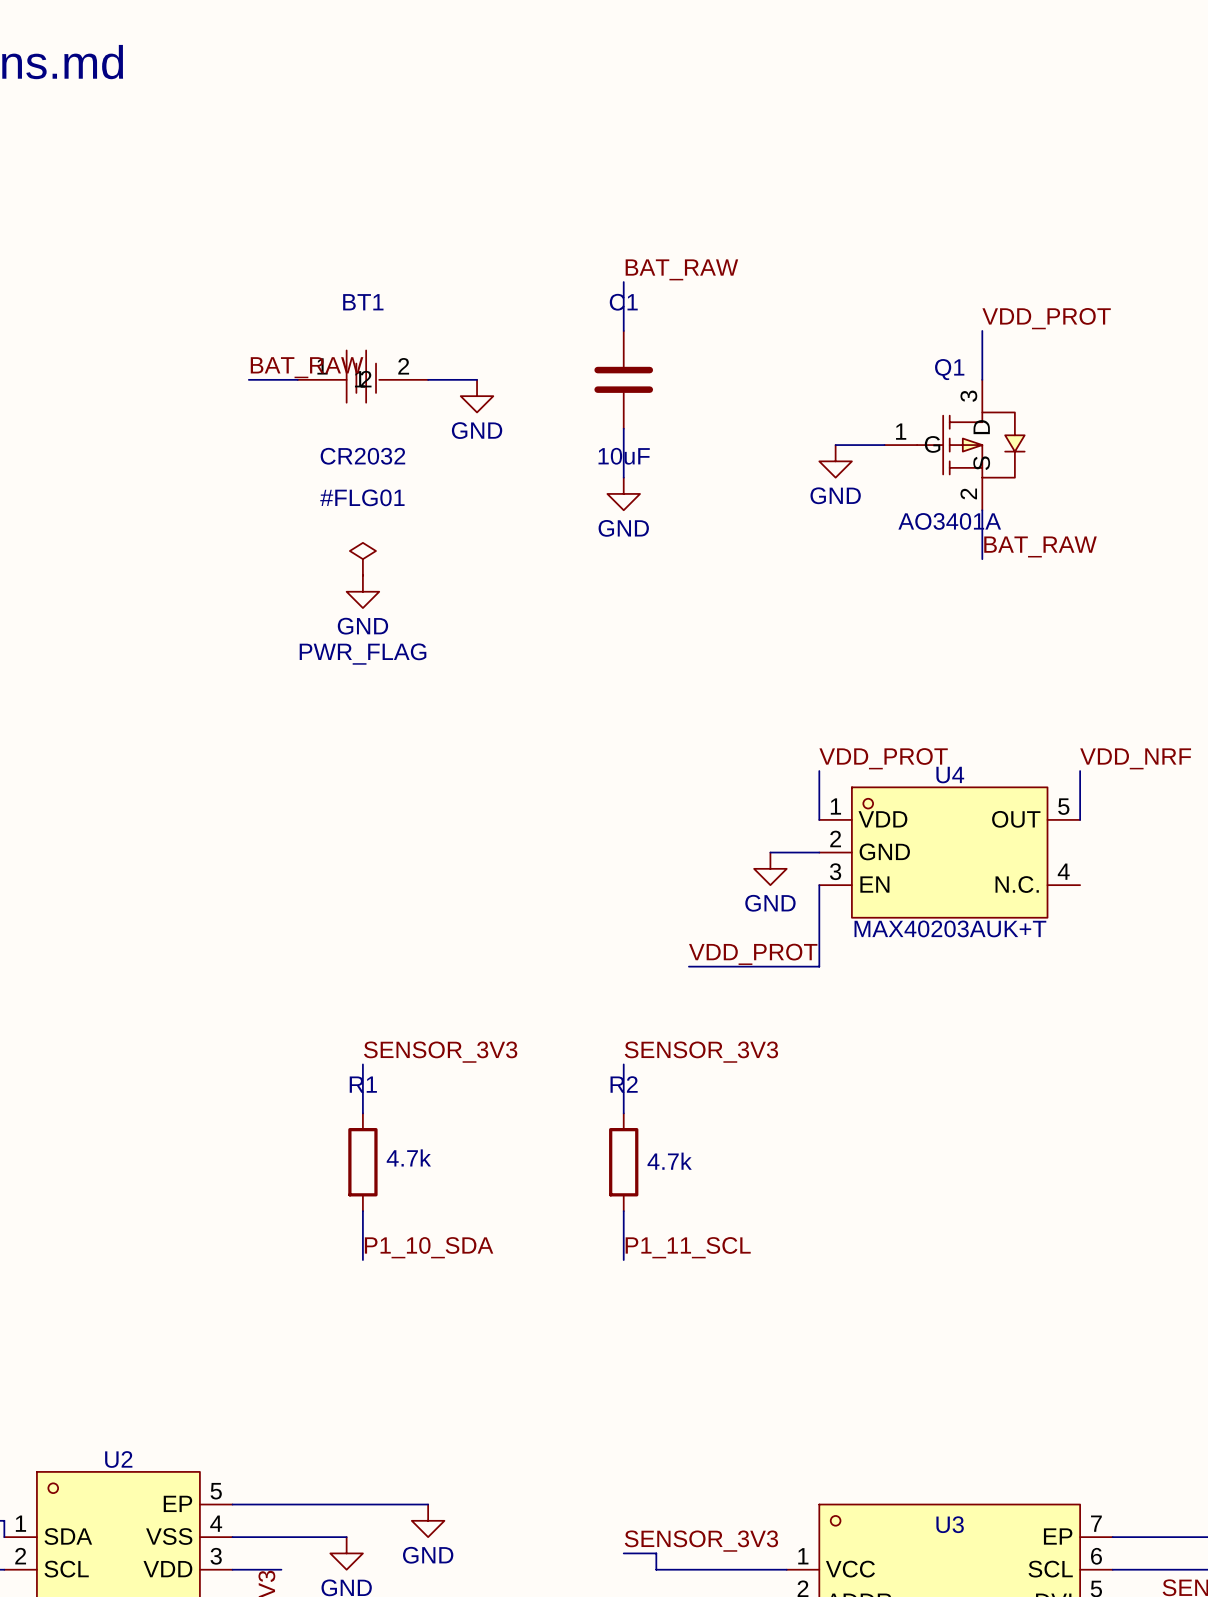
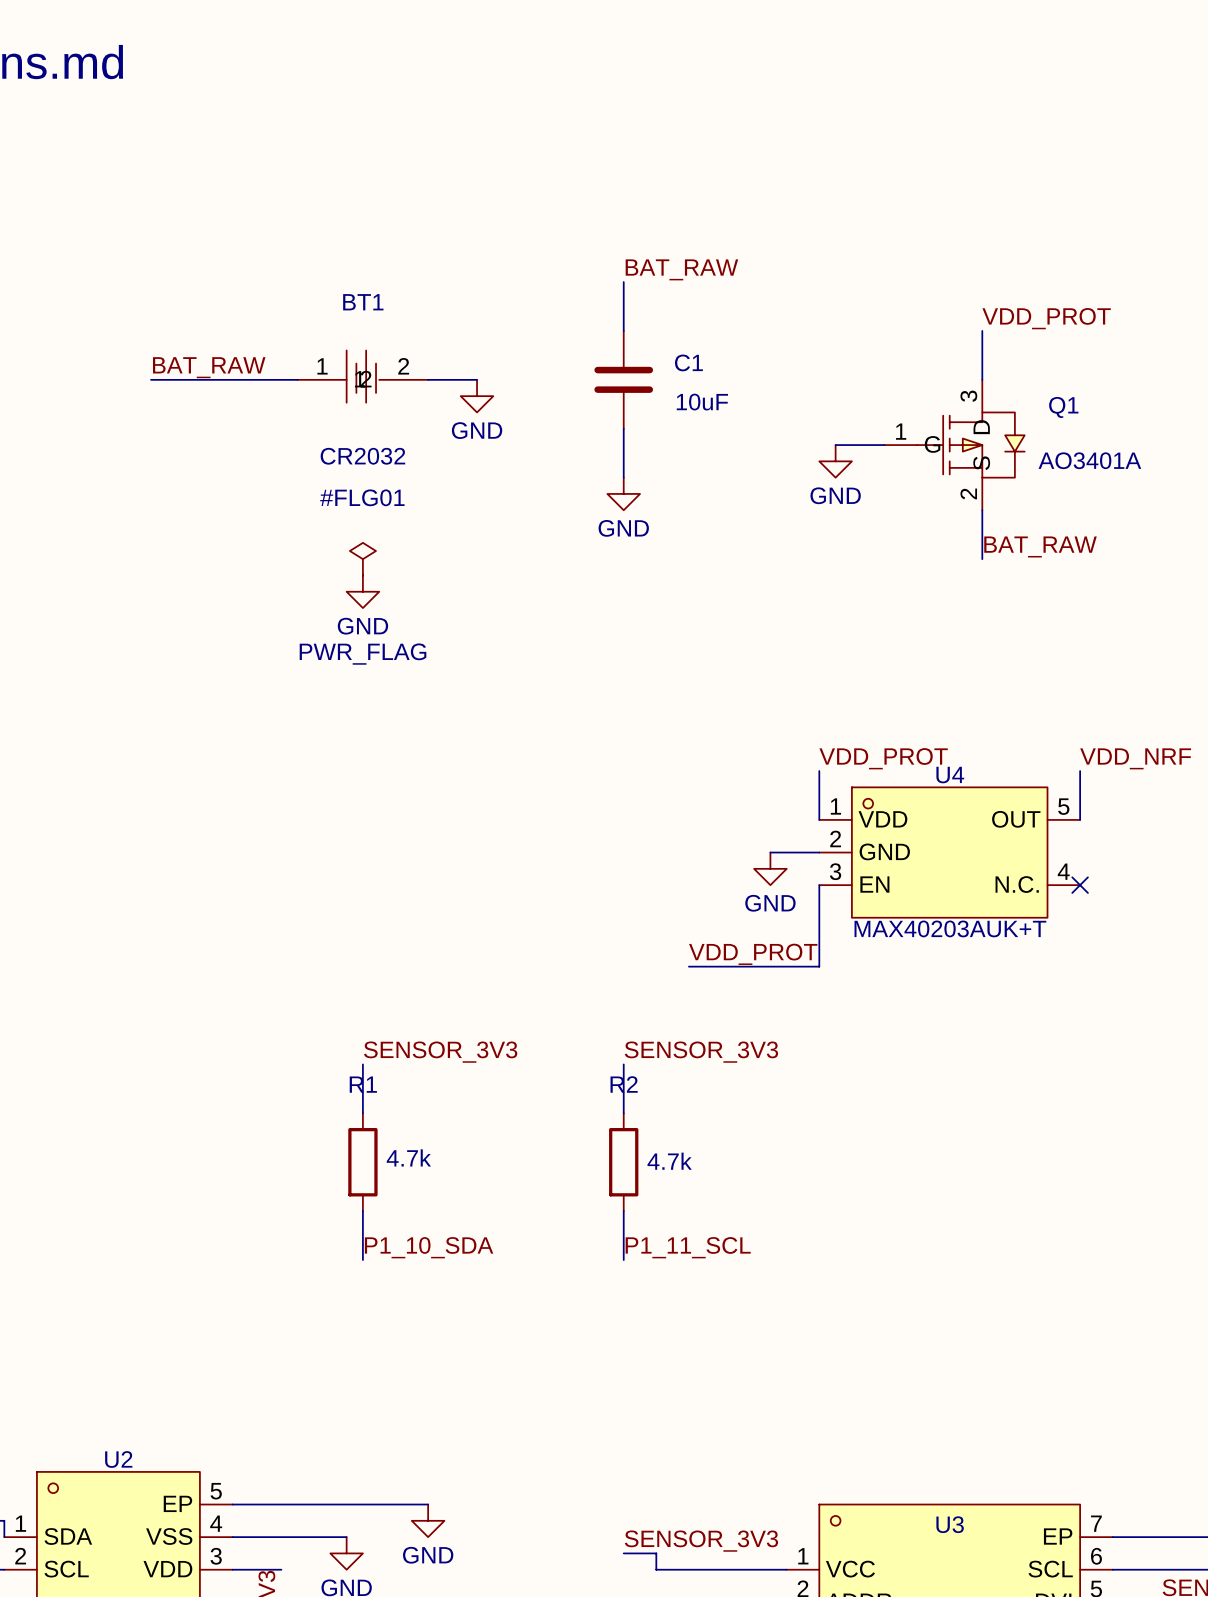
C1 name position: C1 (623, 302) -> C1 (688, 362)
label position: BAT_RAW (307, 367) -> BAT_RAW (209, 367)
Q1 name position: Q1 (949, 369) -> Q1 (1063, 407)
wire: none -> (151, 379) (248, 379)
C1 value position: 10uF (624, 456) -> 10uF (702, 402)
Q1 value position: AO3401A (949, 521) -> AO3401A (1089, 460)
no-connect mark: none -> (1080, 885)

